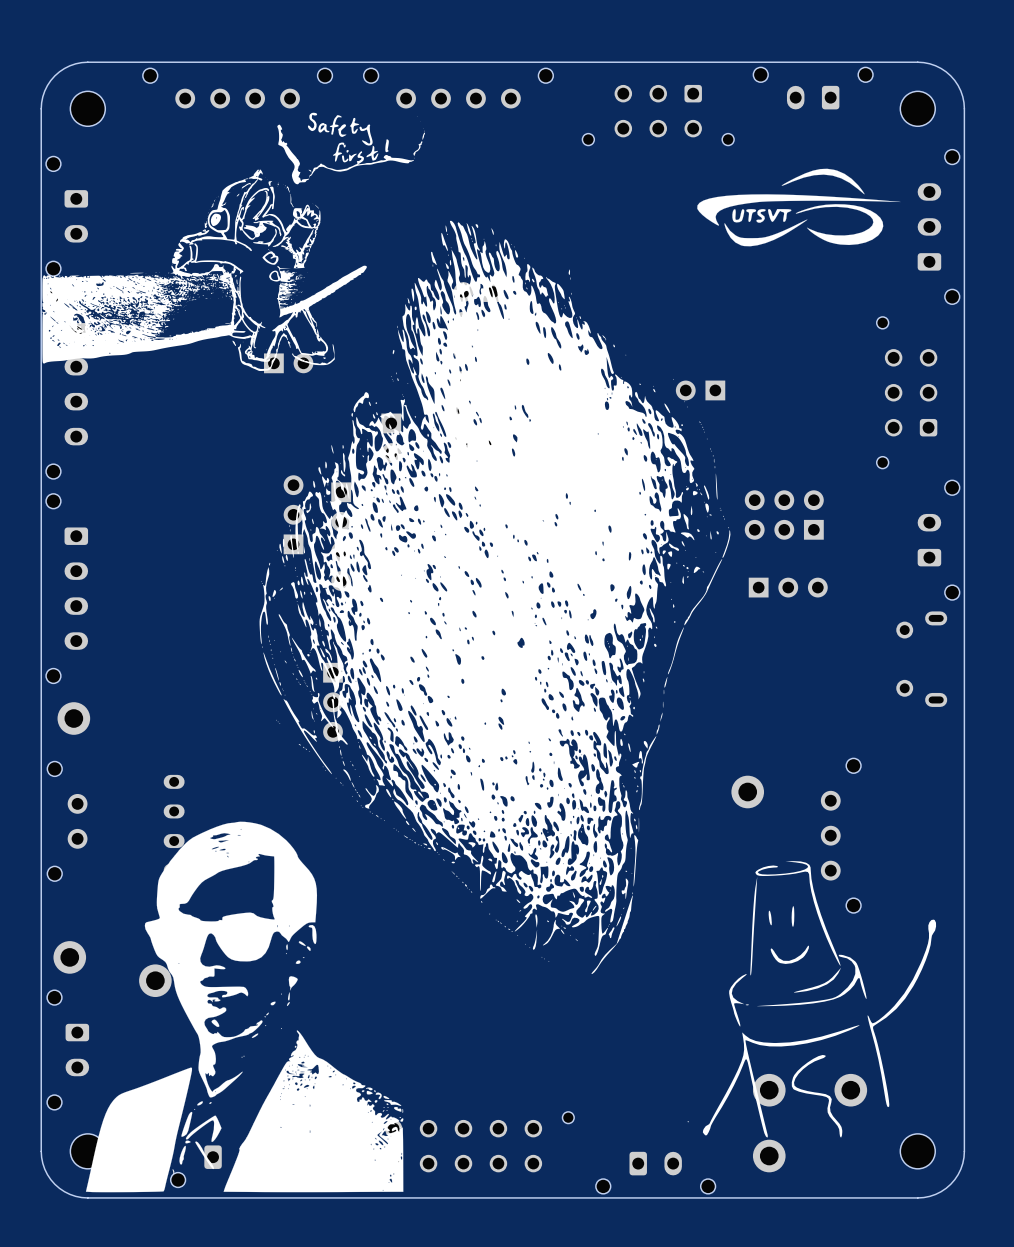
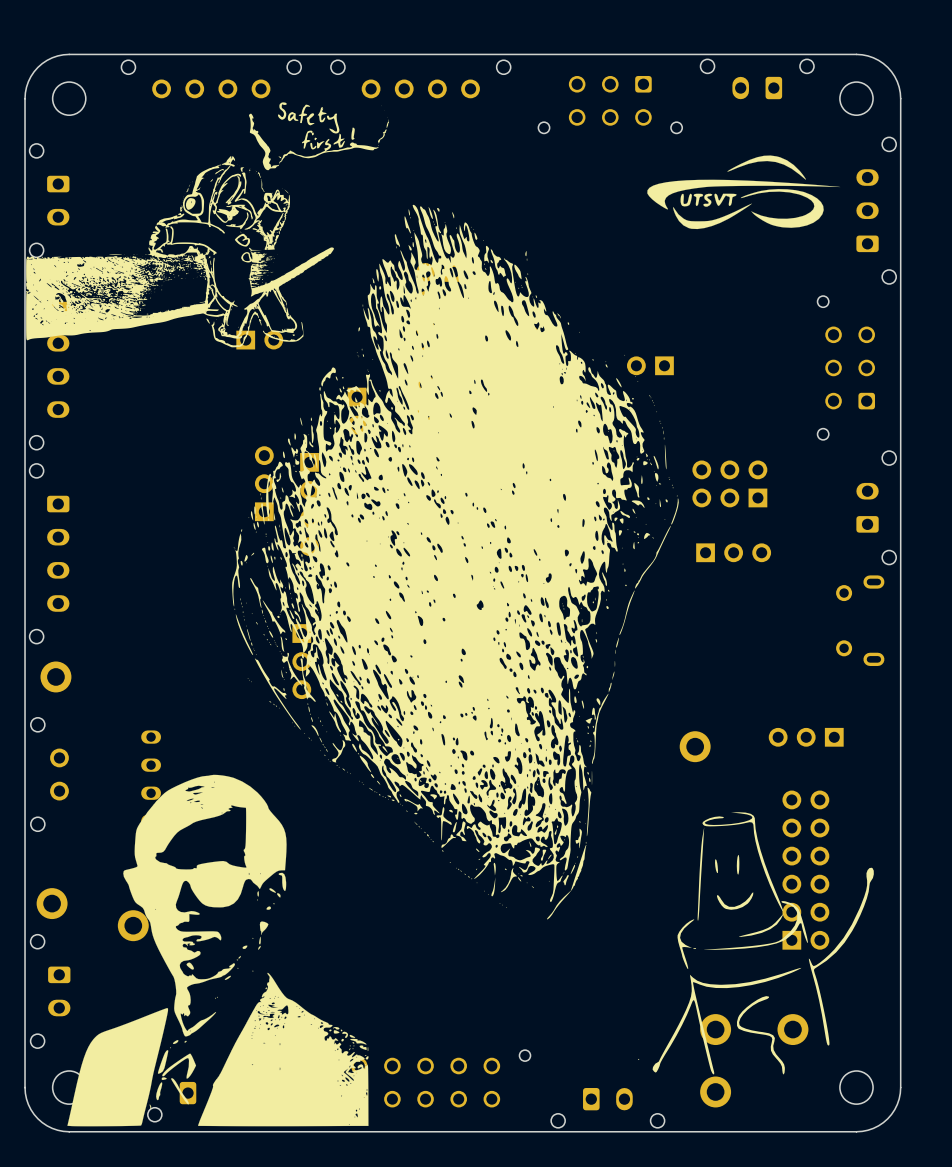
part: none -> (806, 737)
part: (840, 835) -> none
part: none -> (805, 870)

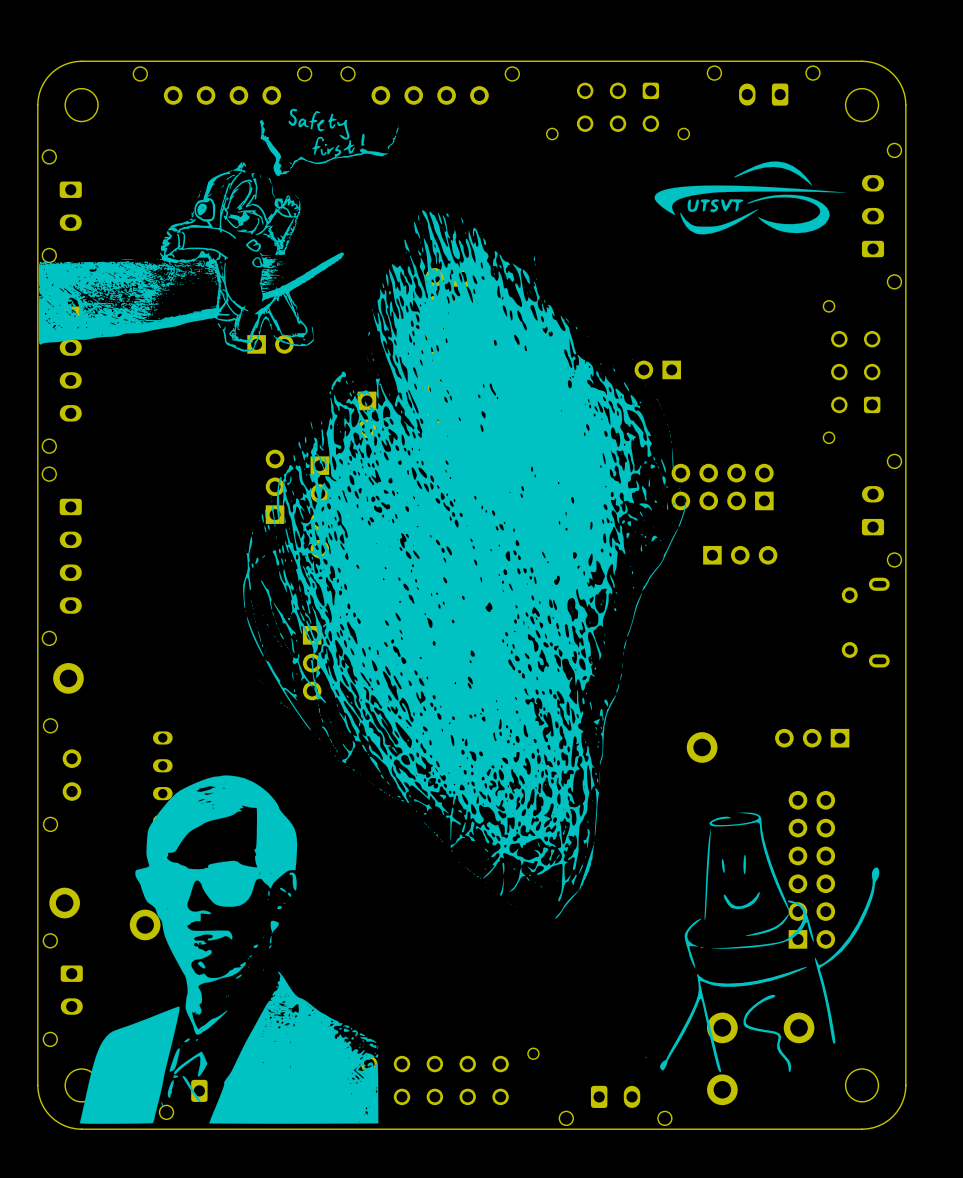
part: none -> (722, 487)

